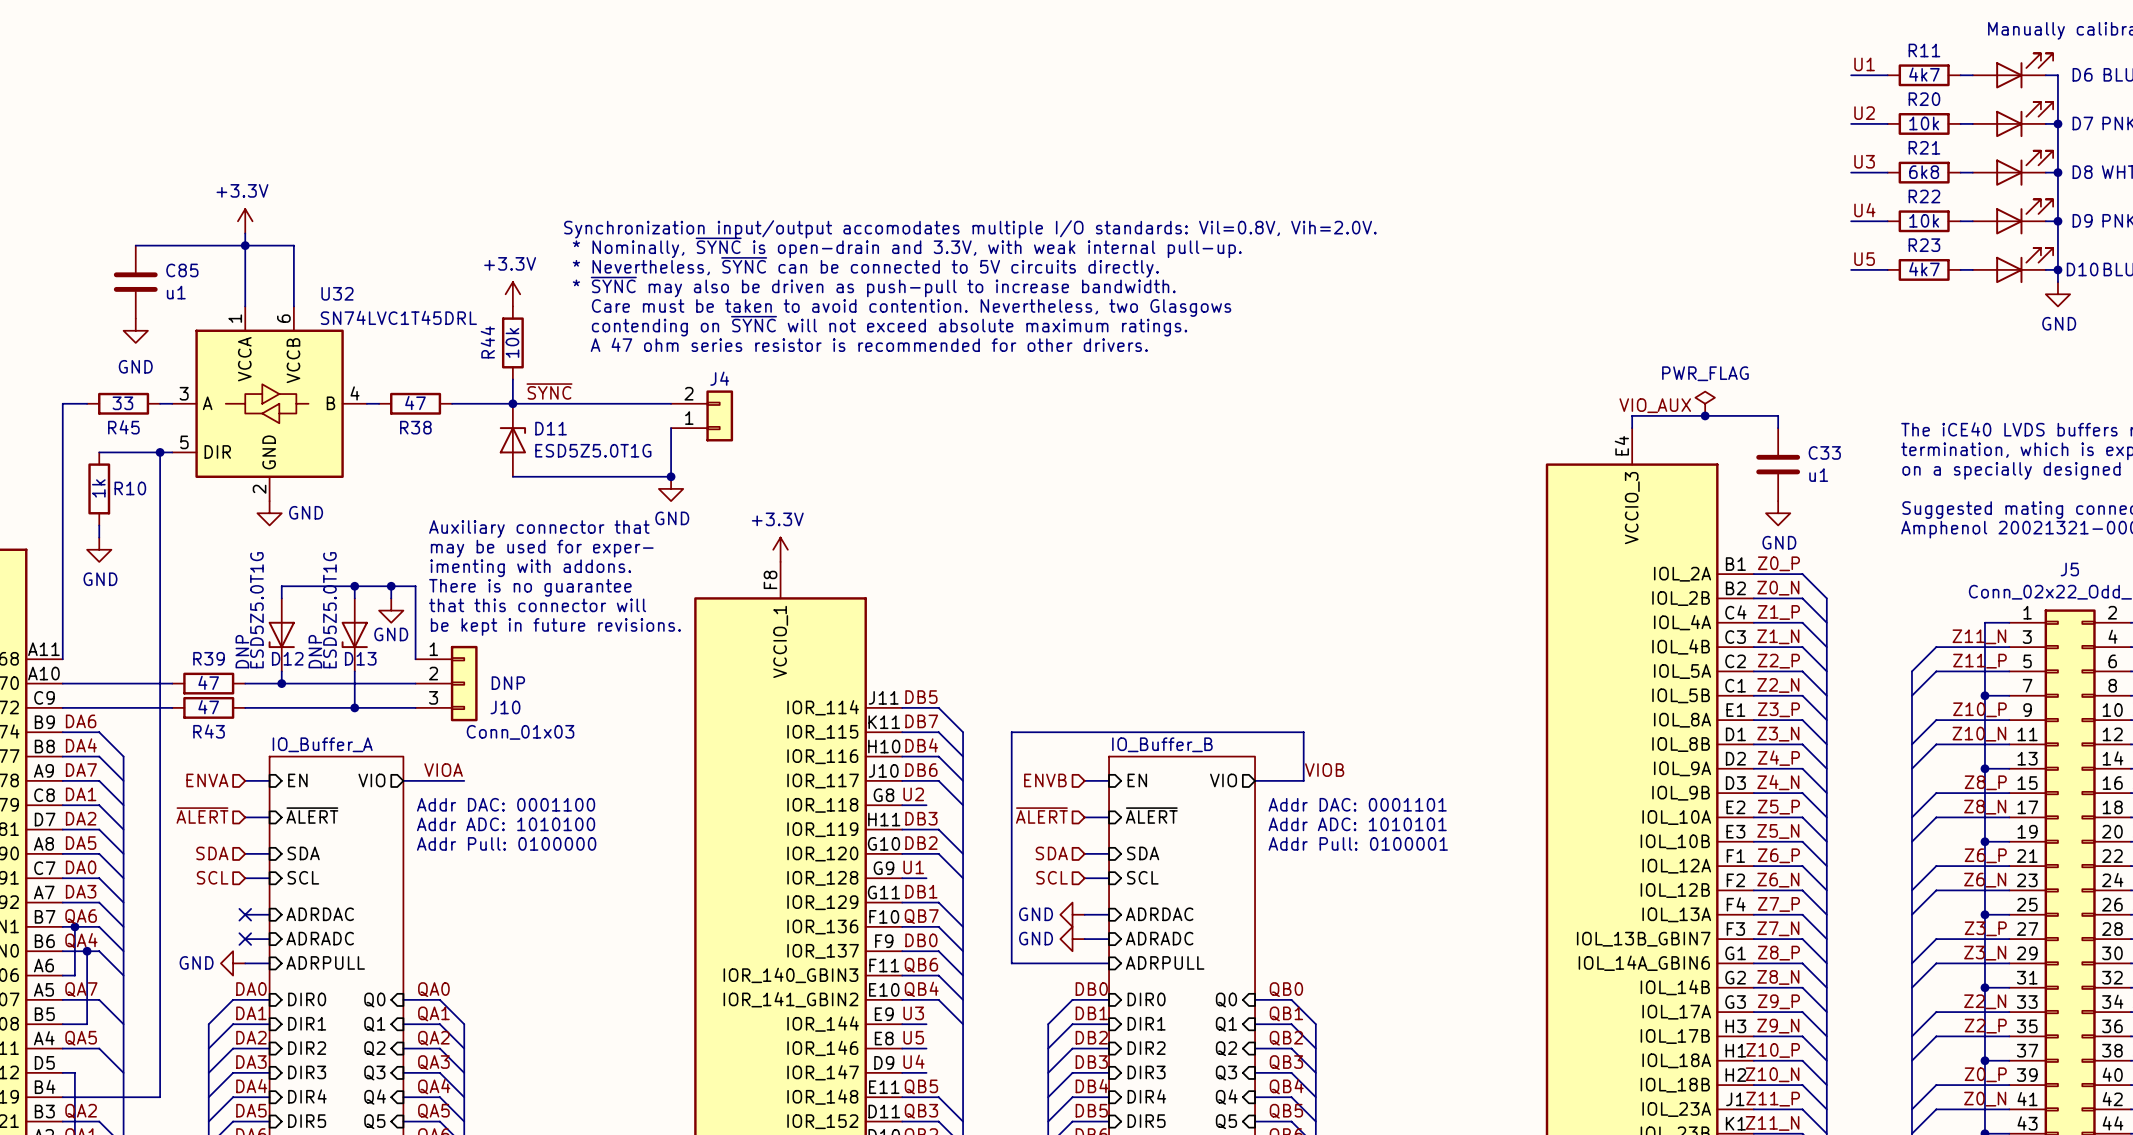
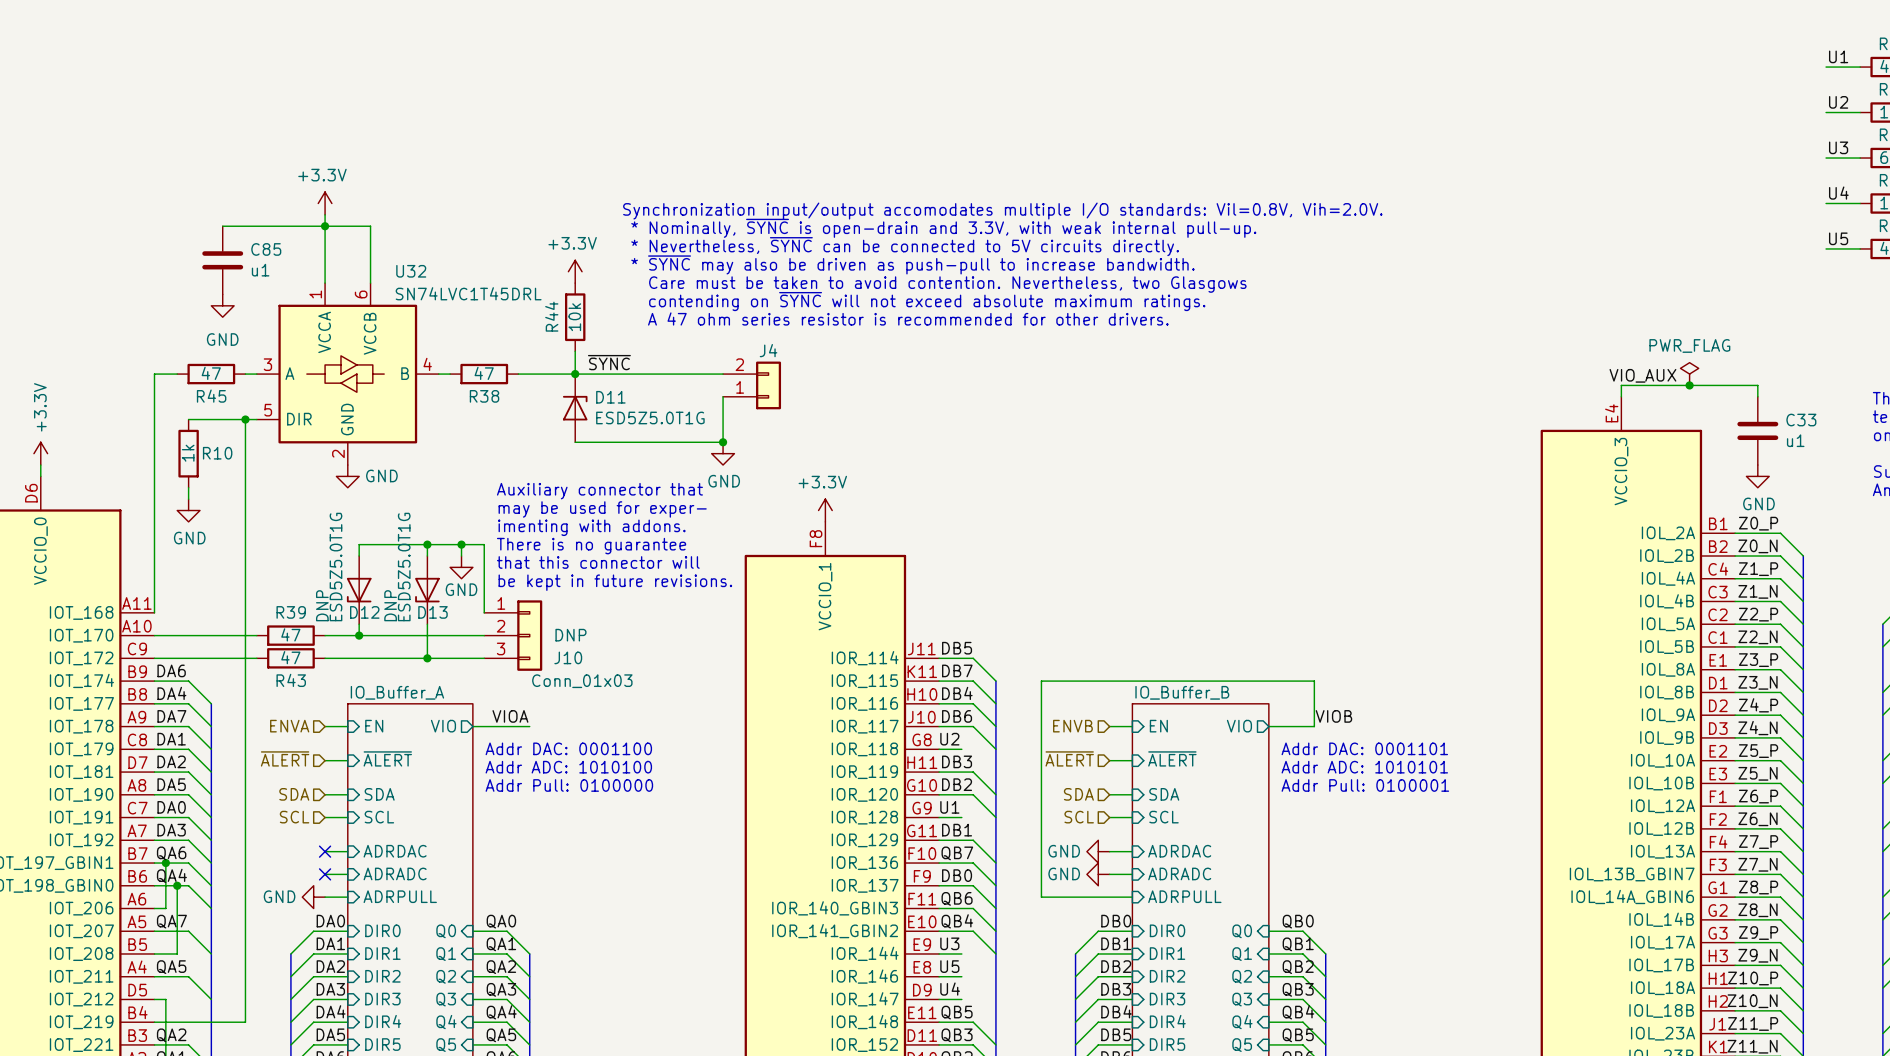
R45 value: 33 (122, 403) -> 47 (211, 373)

